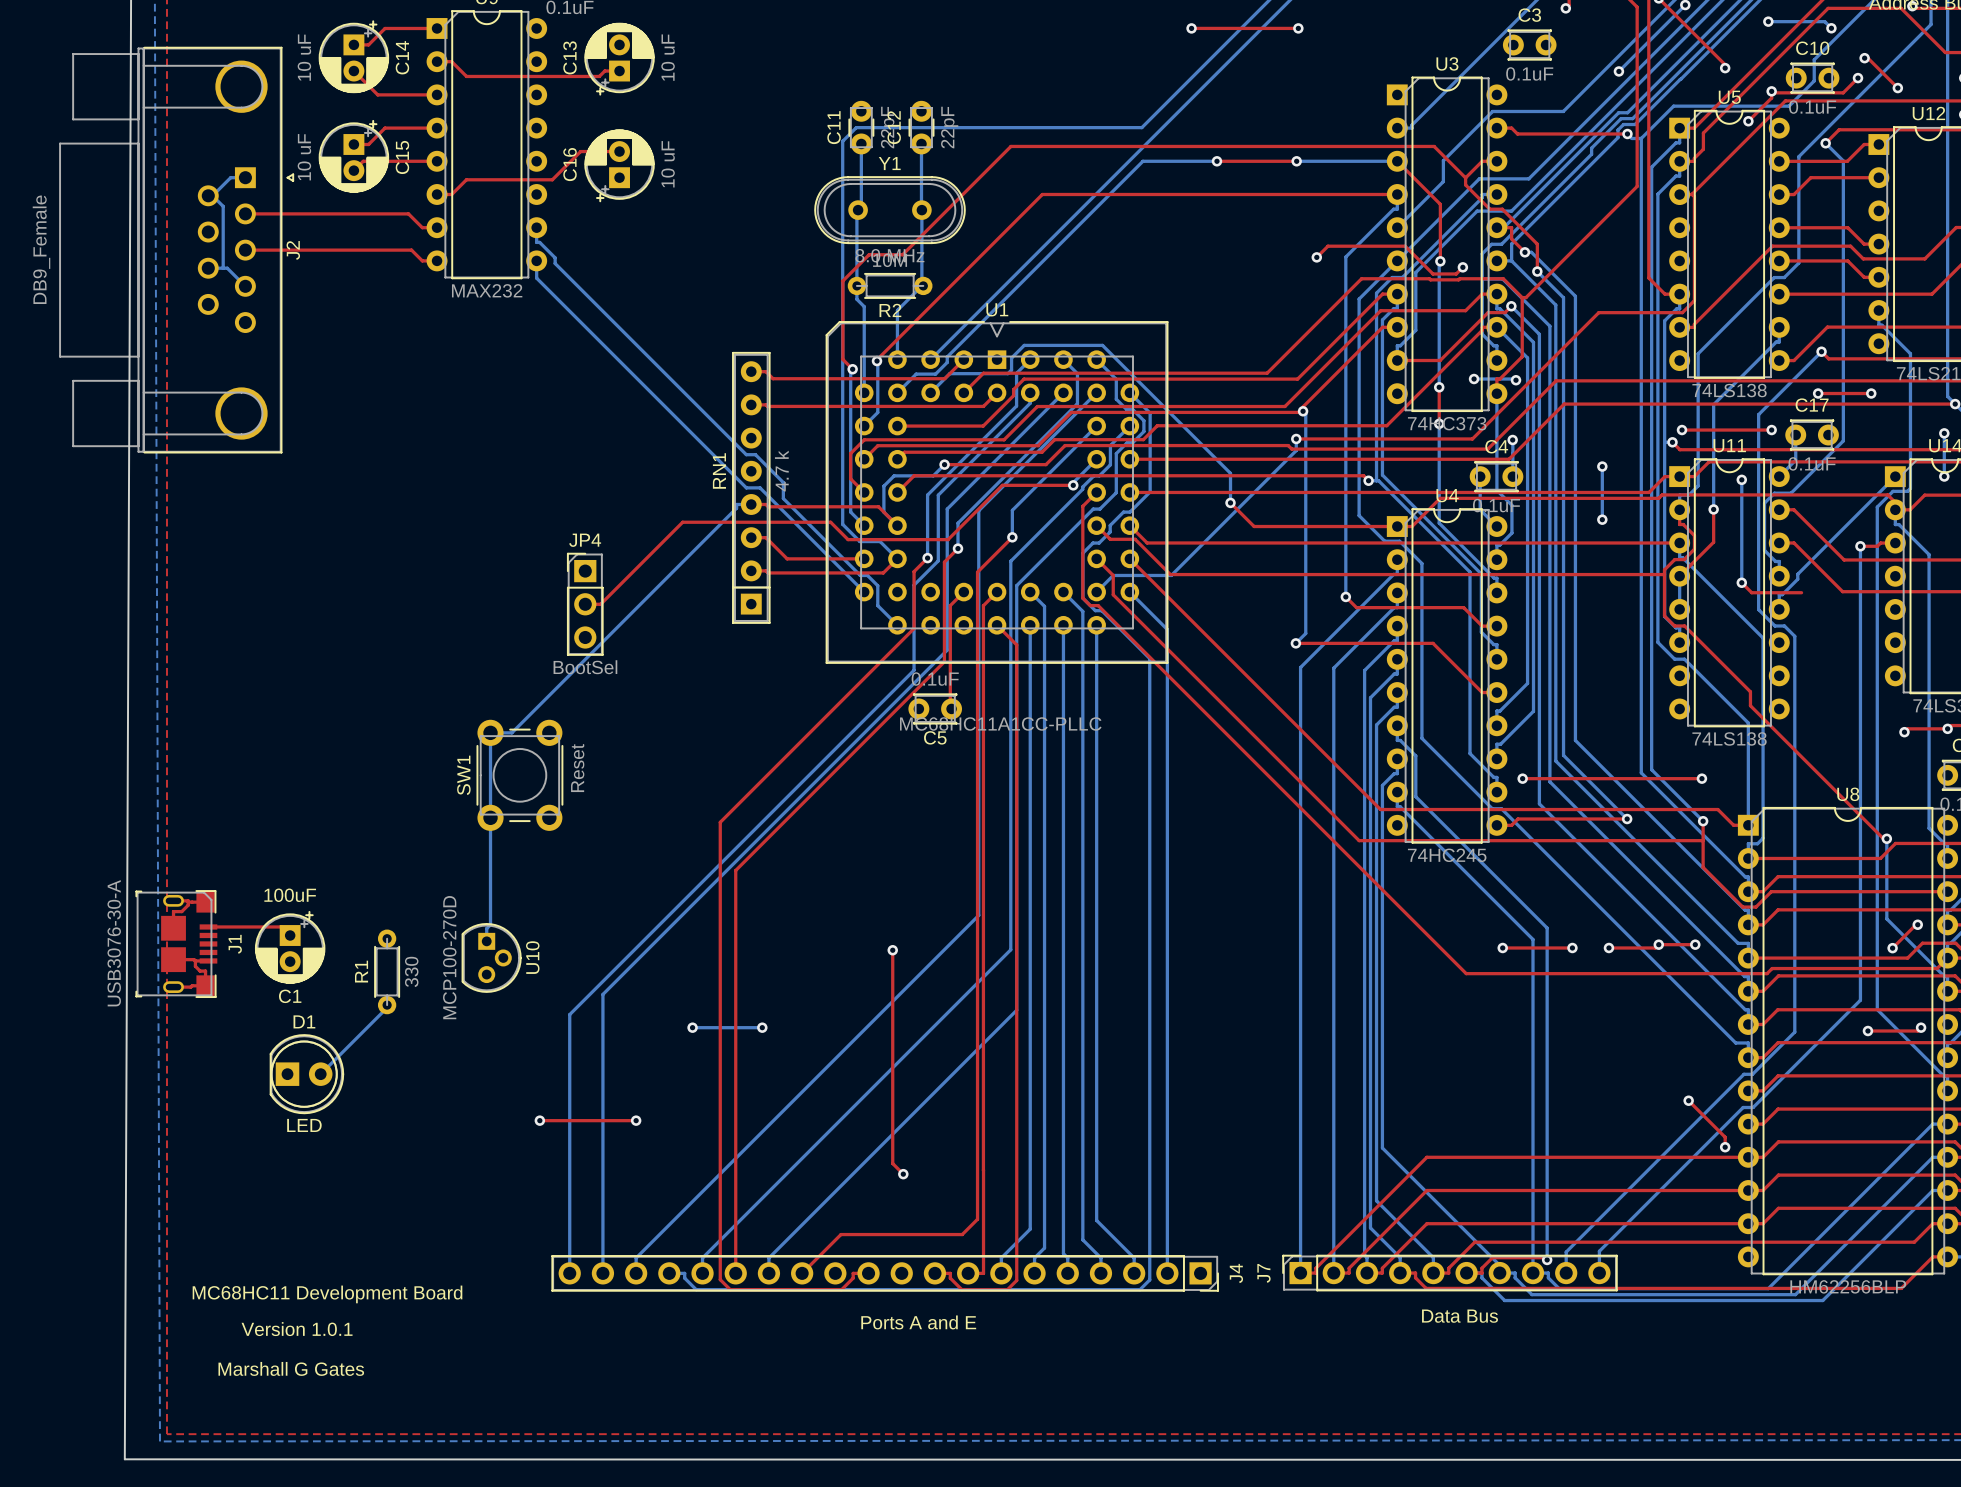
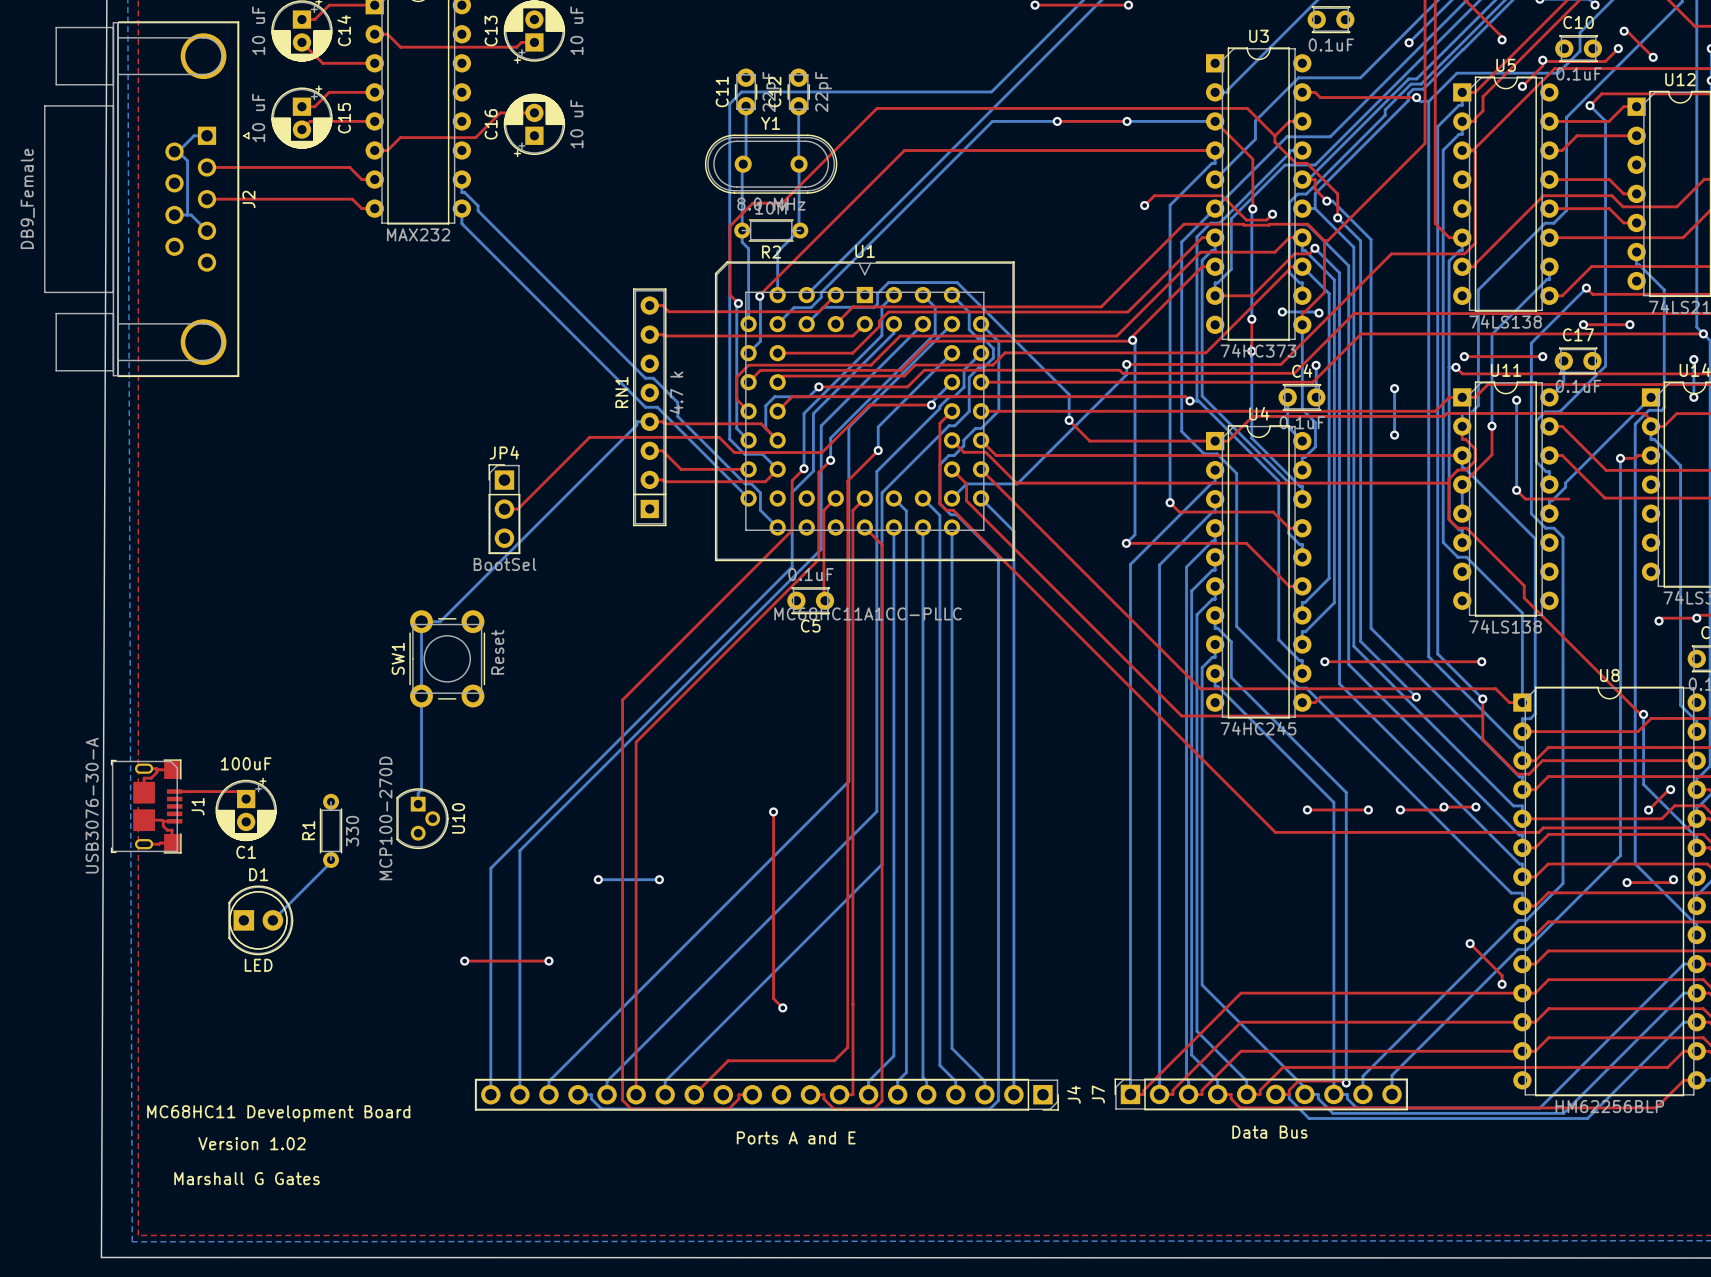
text: Version 1.0.1 (297, 1329) -> Version 1.02 (252, 1143)

